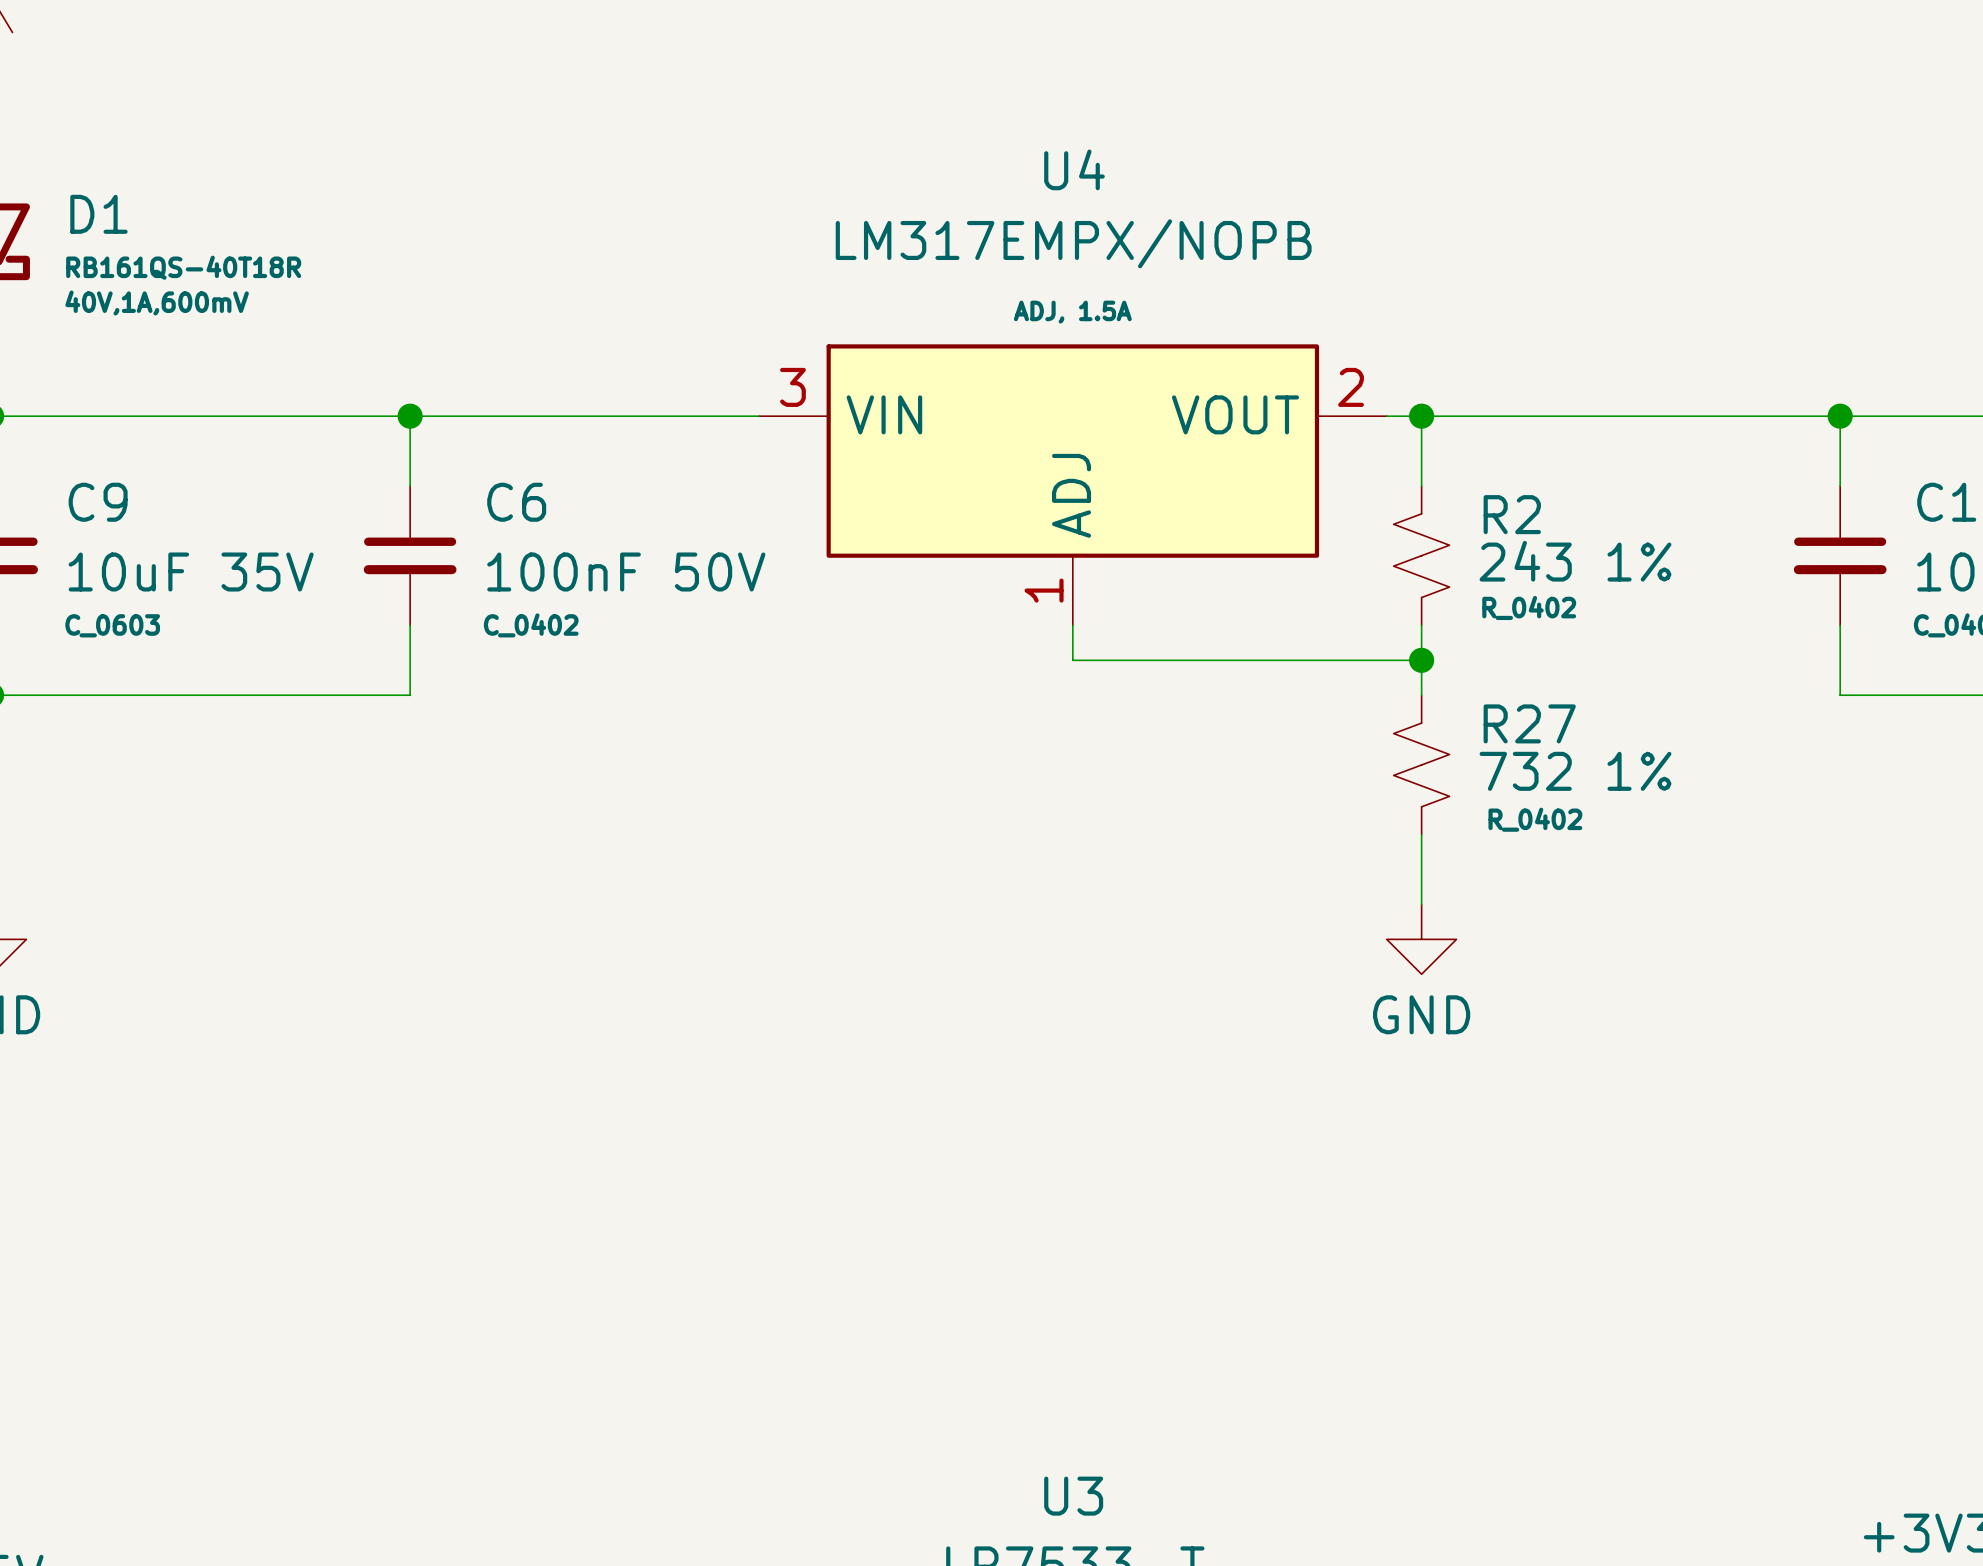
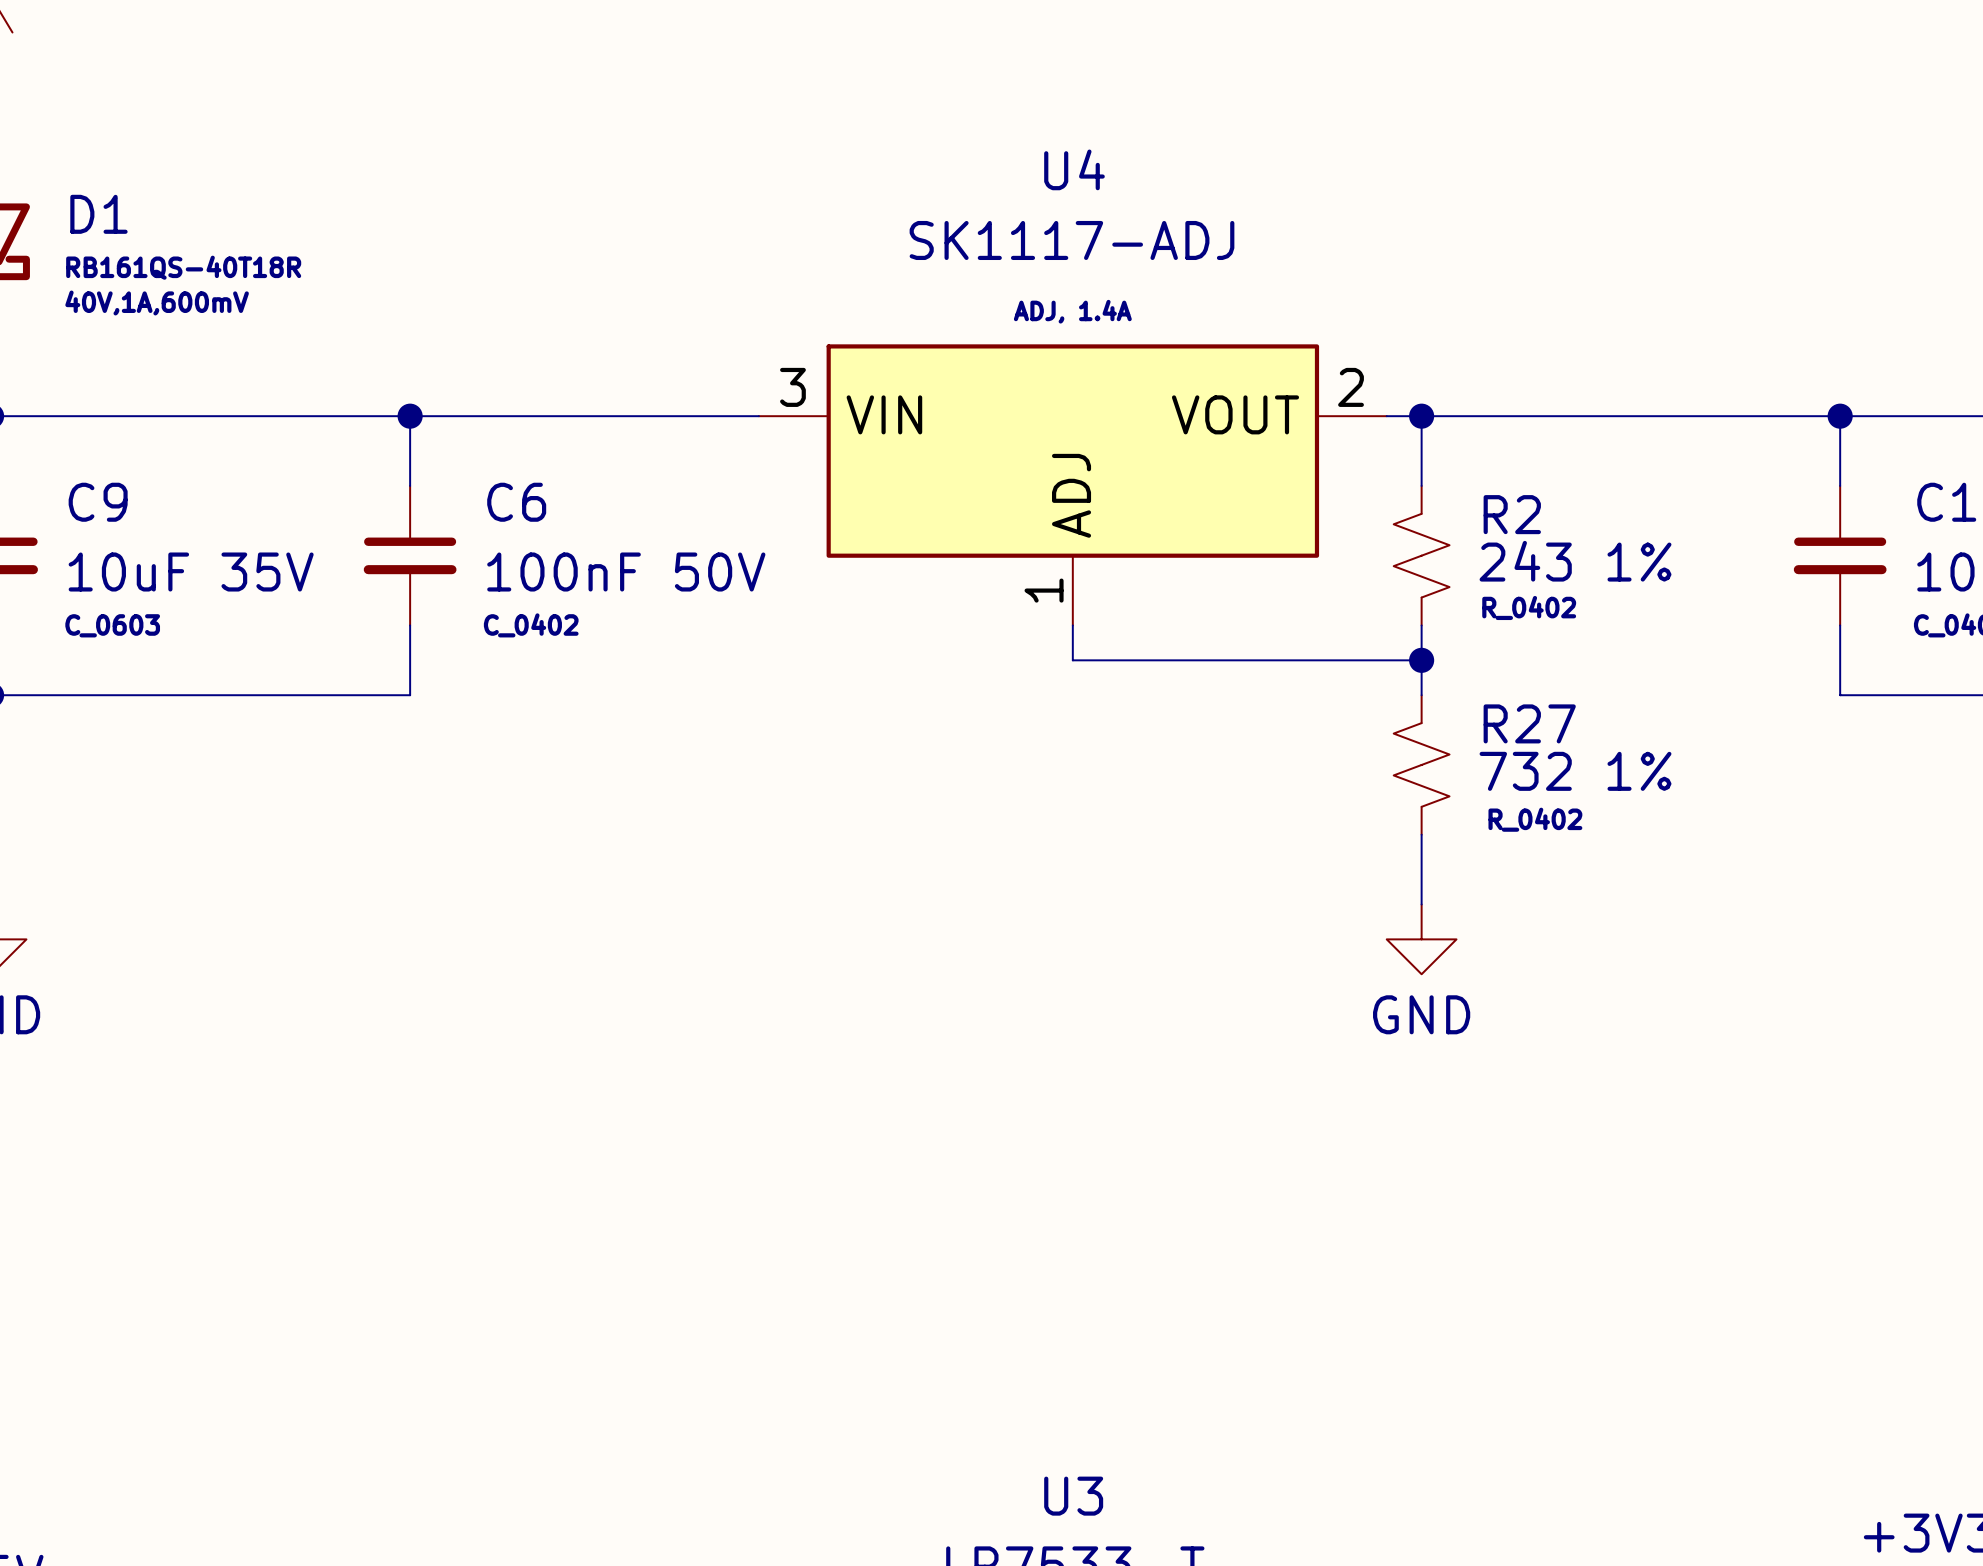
U4 value: LM317EMPX/NOPB (1073, 243) -> SK1117-ADJ (1072, 240)
U4 text: ADJ, 1.5A (1072, 312) -> ADJ, 1.4A (1072, 311)

